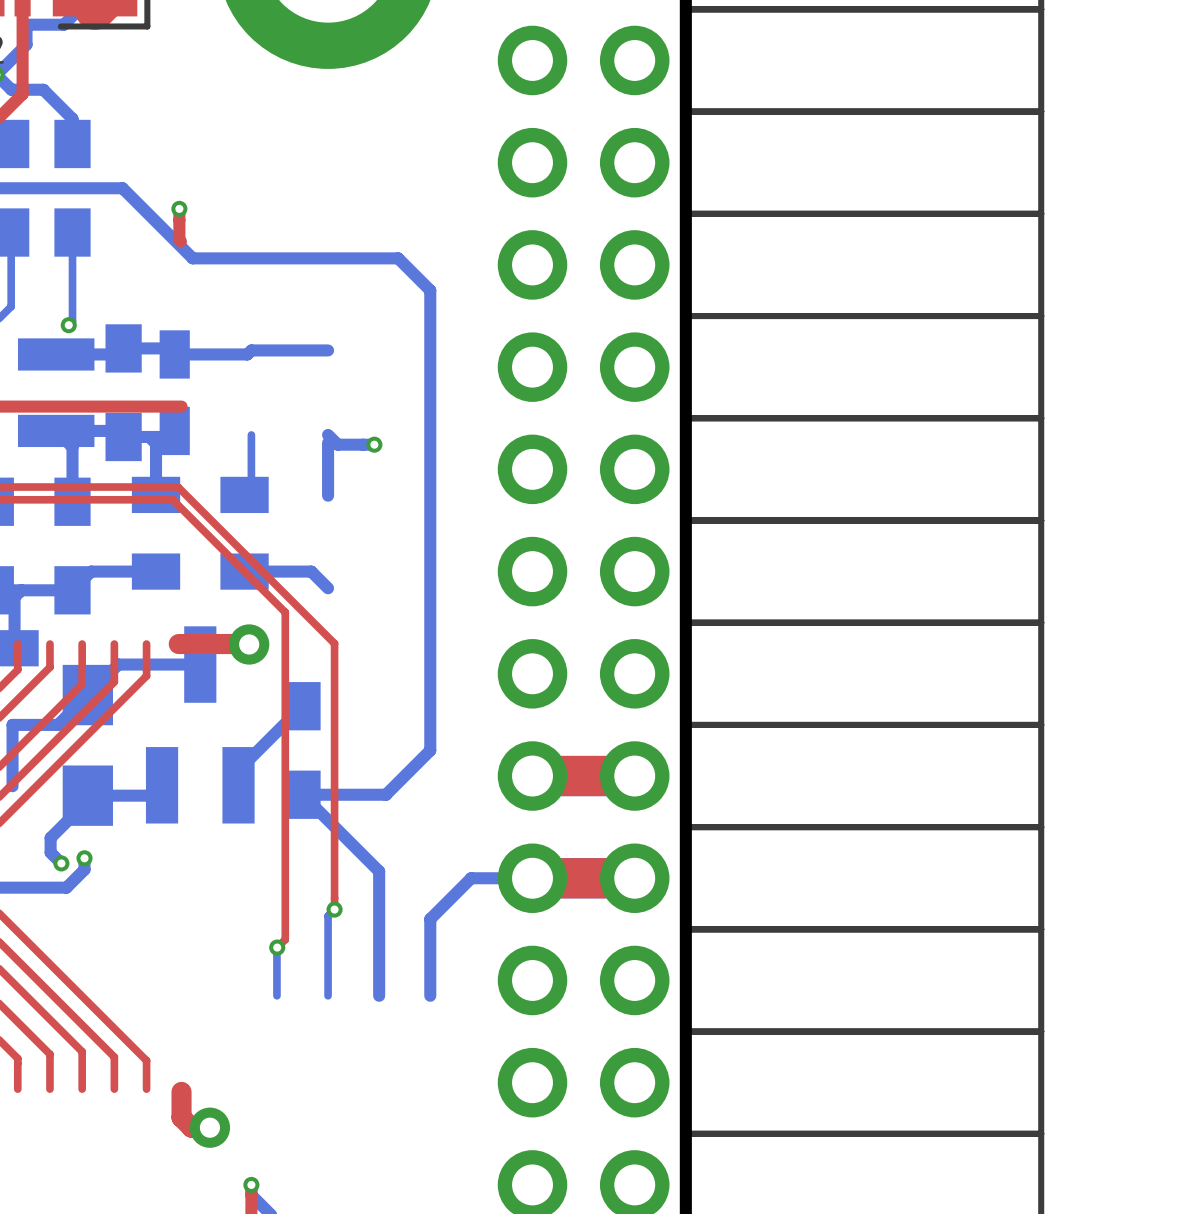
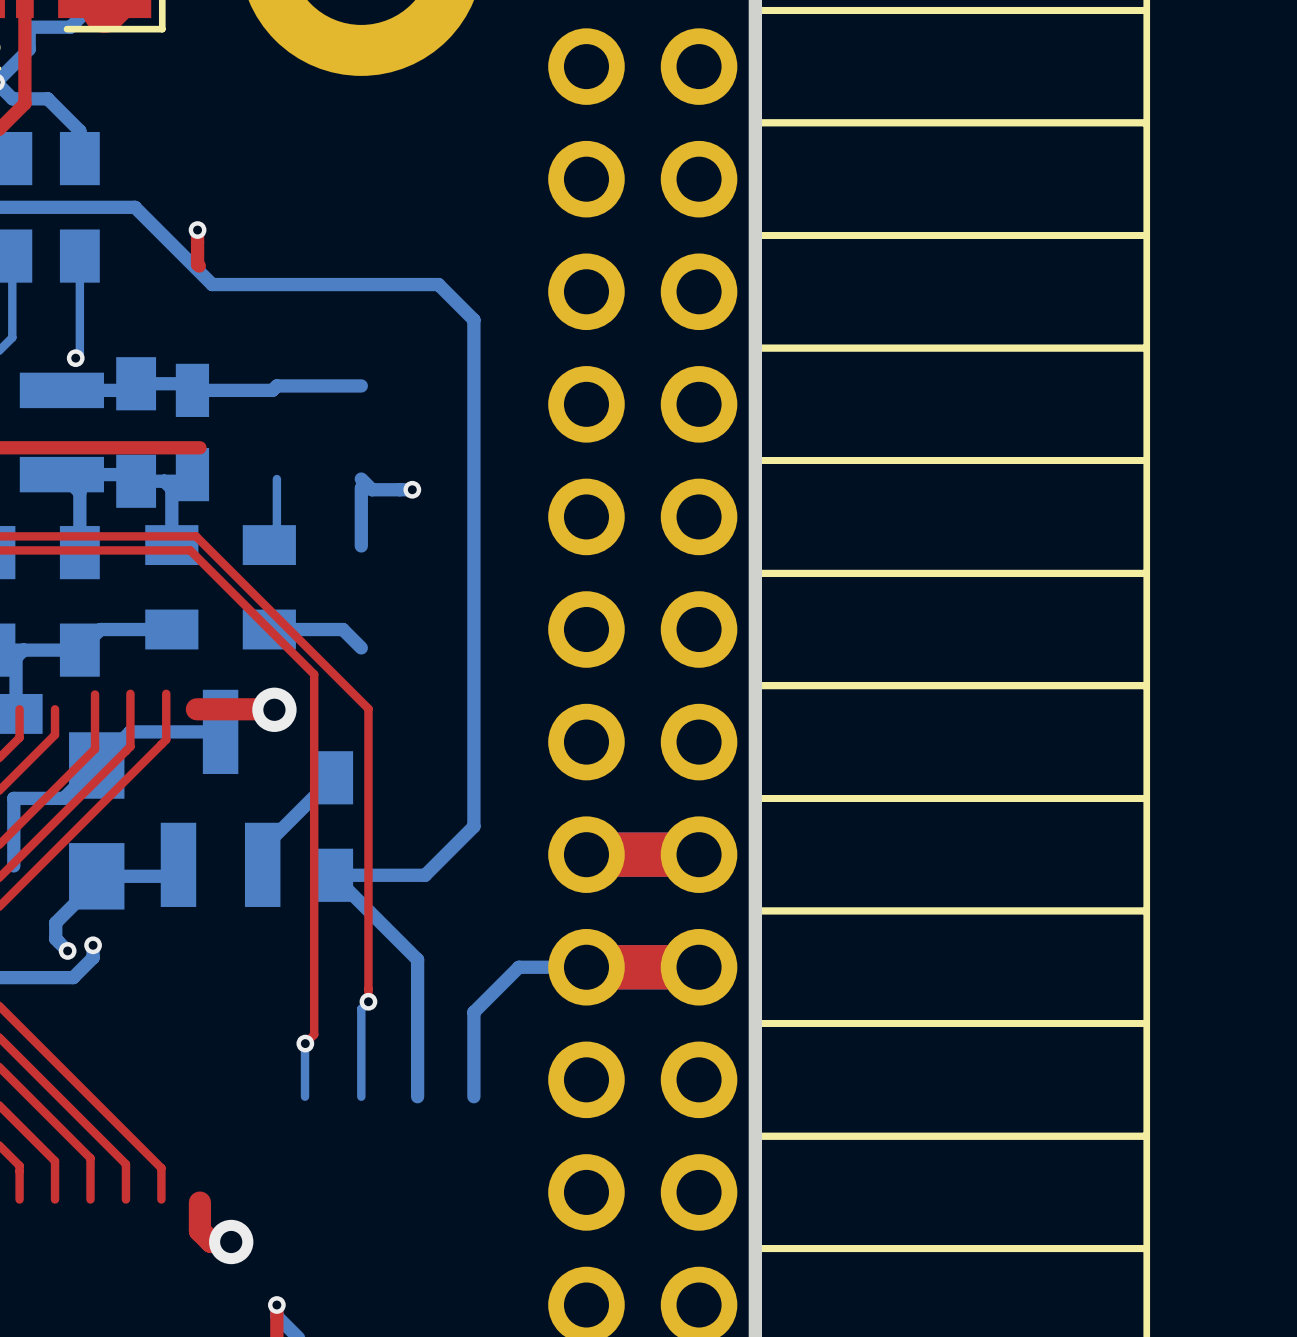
top track: (82, 644) (82, 684) -> (95, 694) (95, 748) (90, 753)
top track: (114, 644) (114, 681) -> (130, 693) (130, 746) (125, 751)
top track: (146, 644) (146, 675) -> (166, 693) (166, 739) (161, 744)

